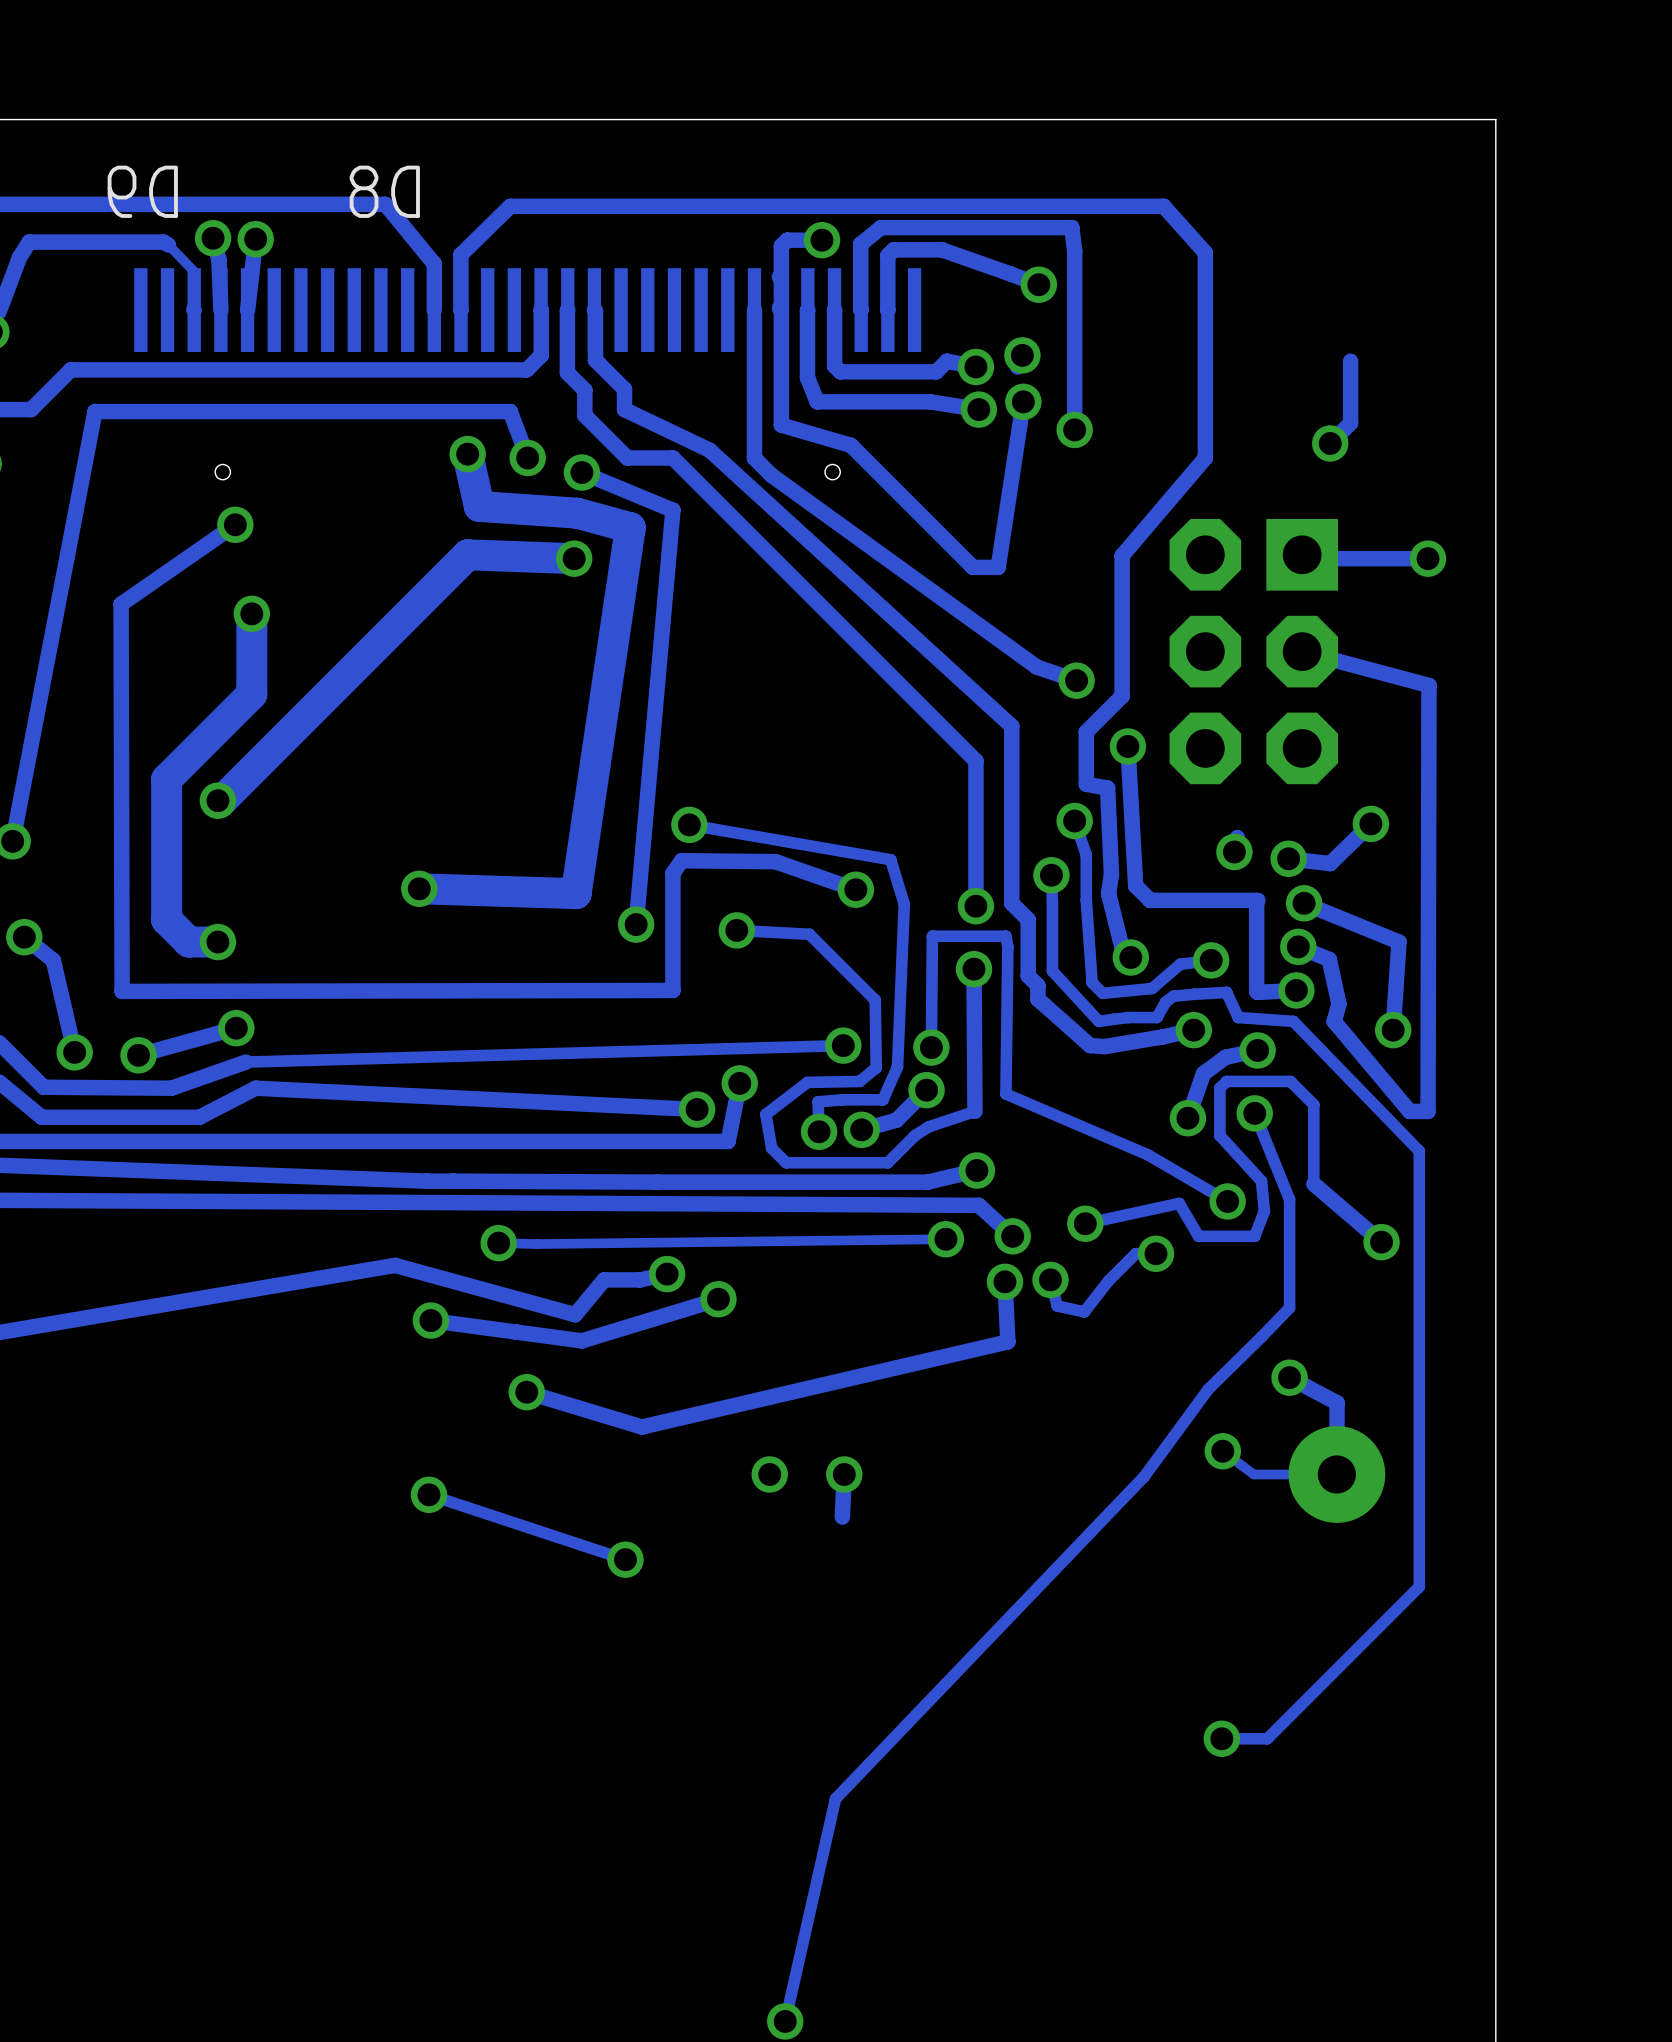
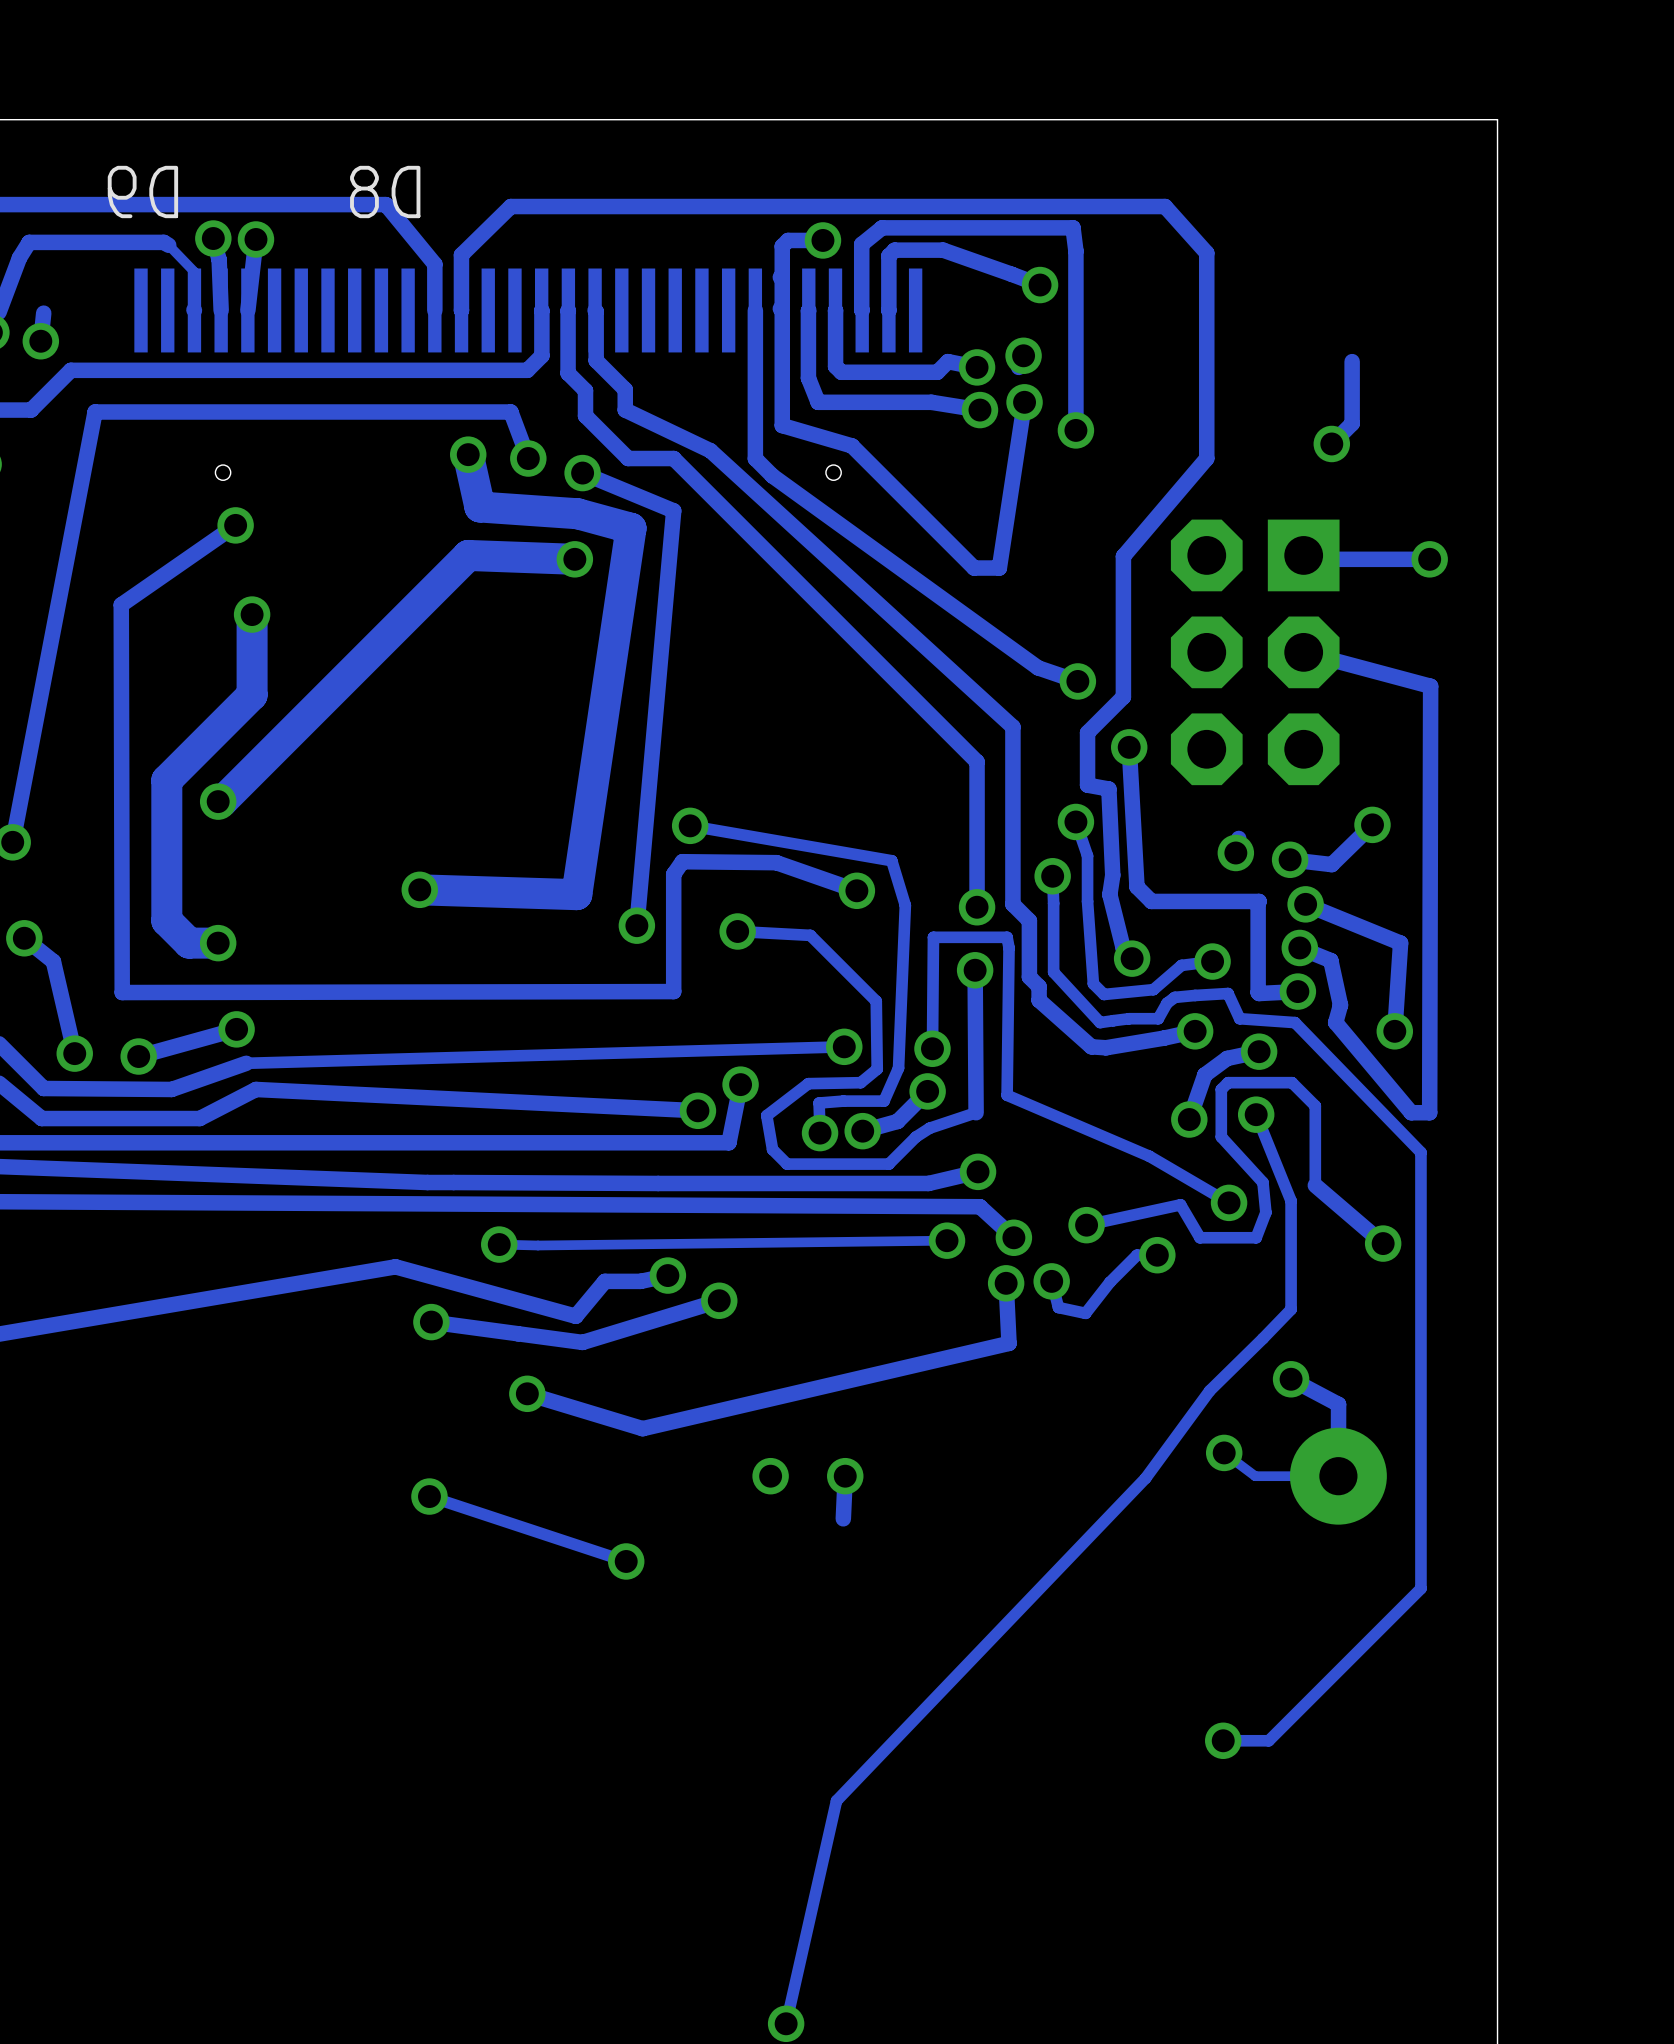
track: none -> (43, 313) (40, 341)
via: none -> (40, 341)

